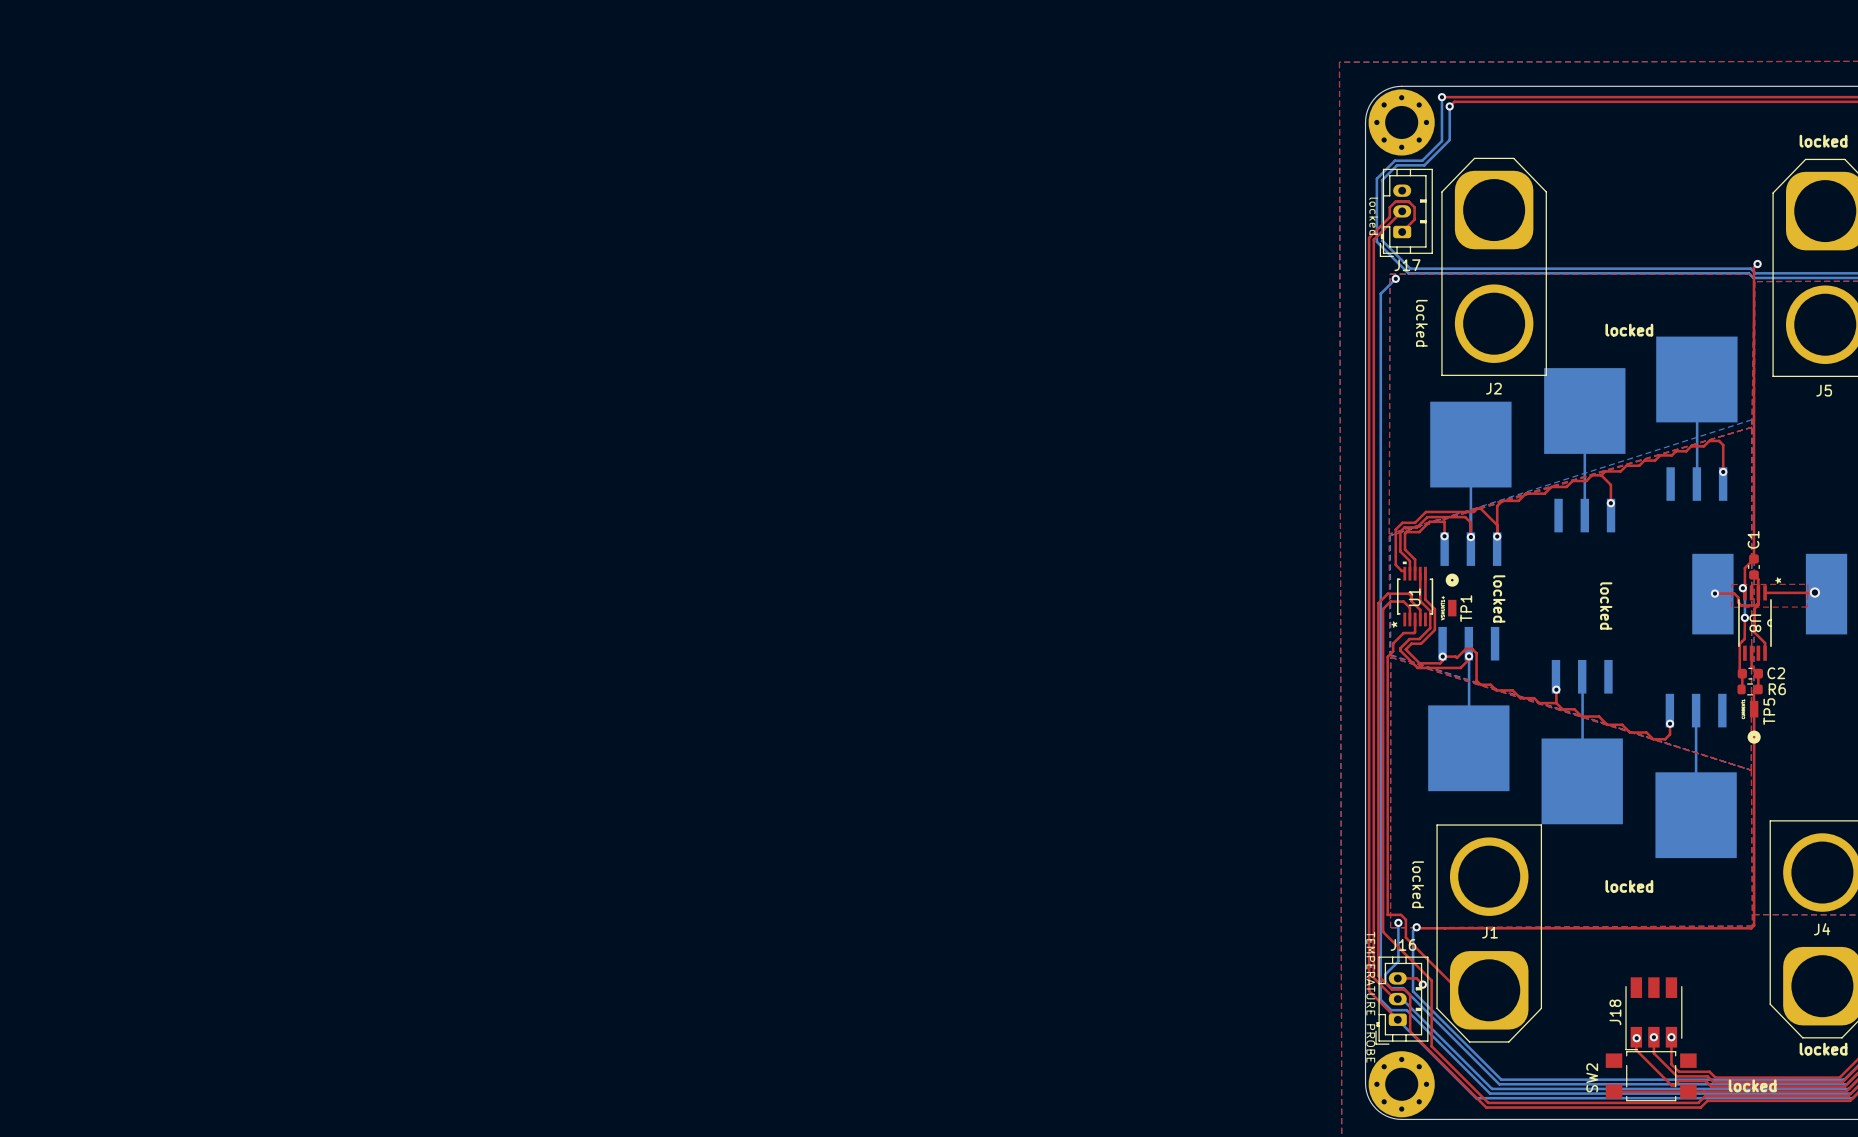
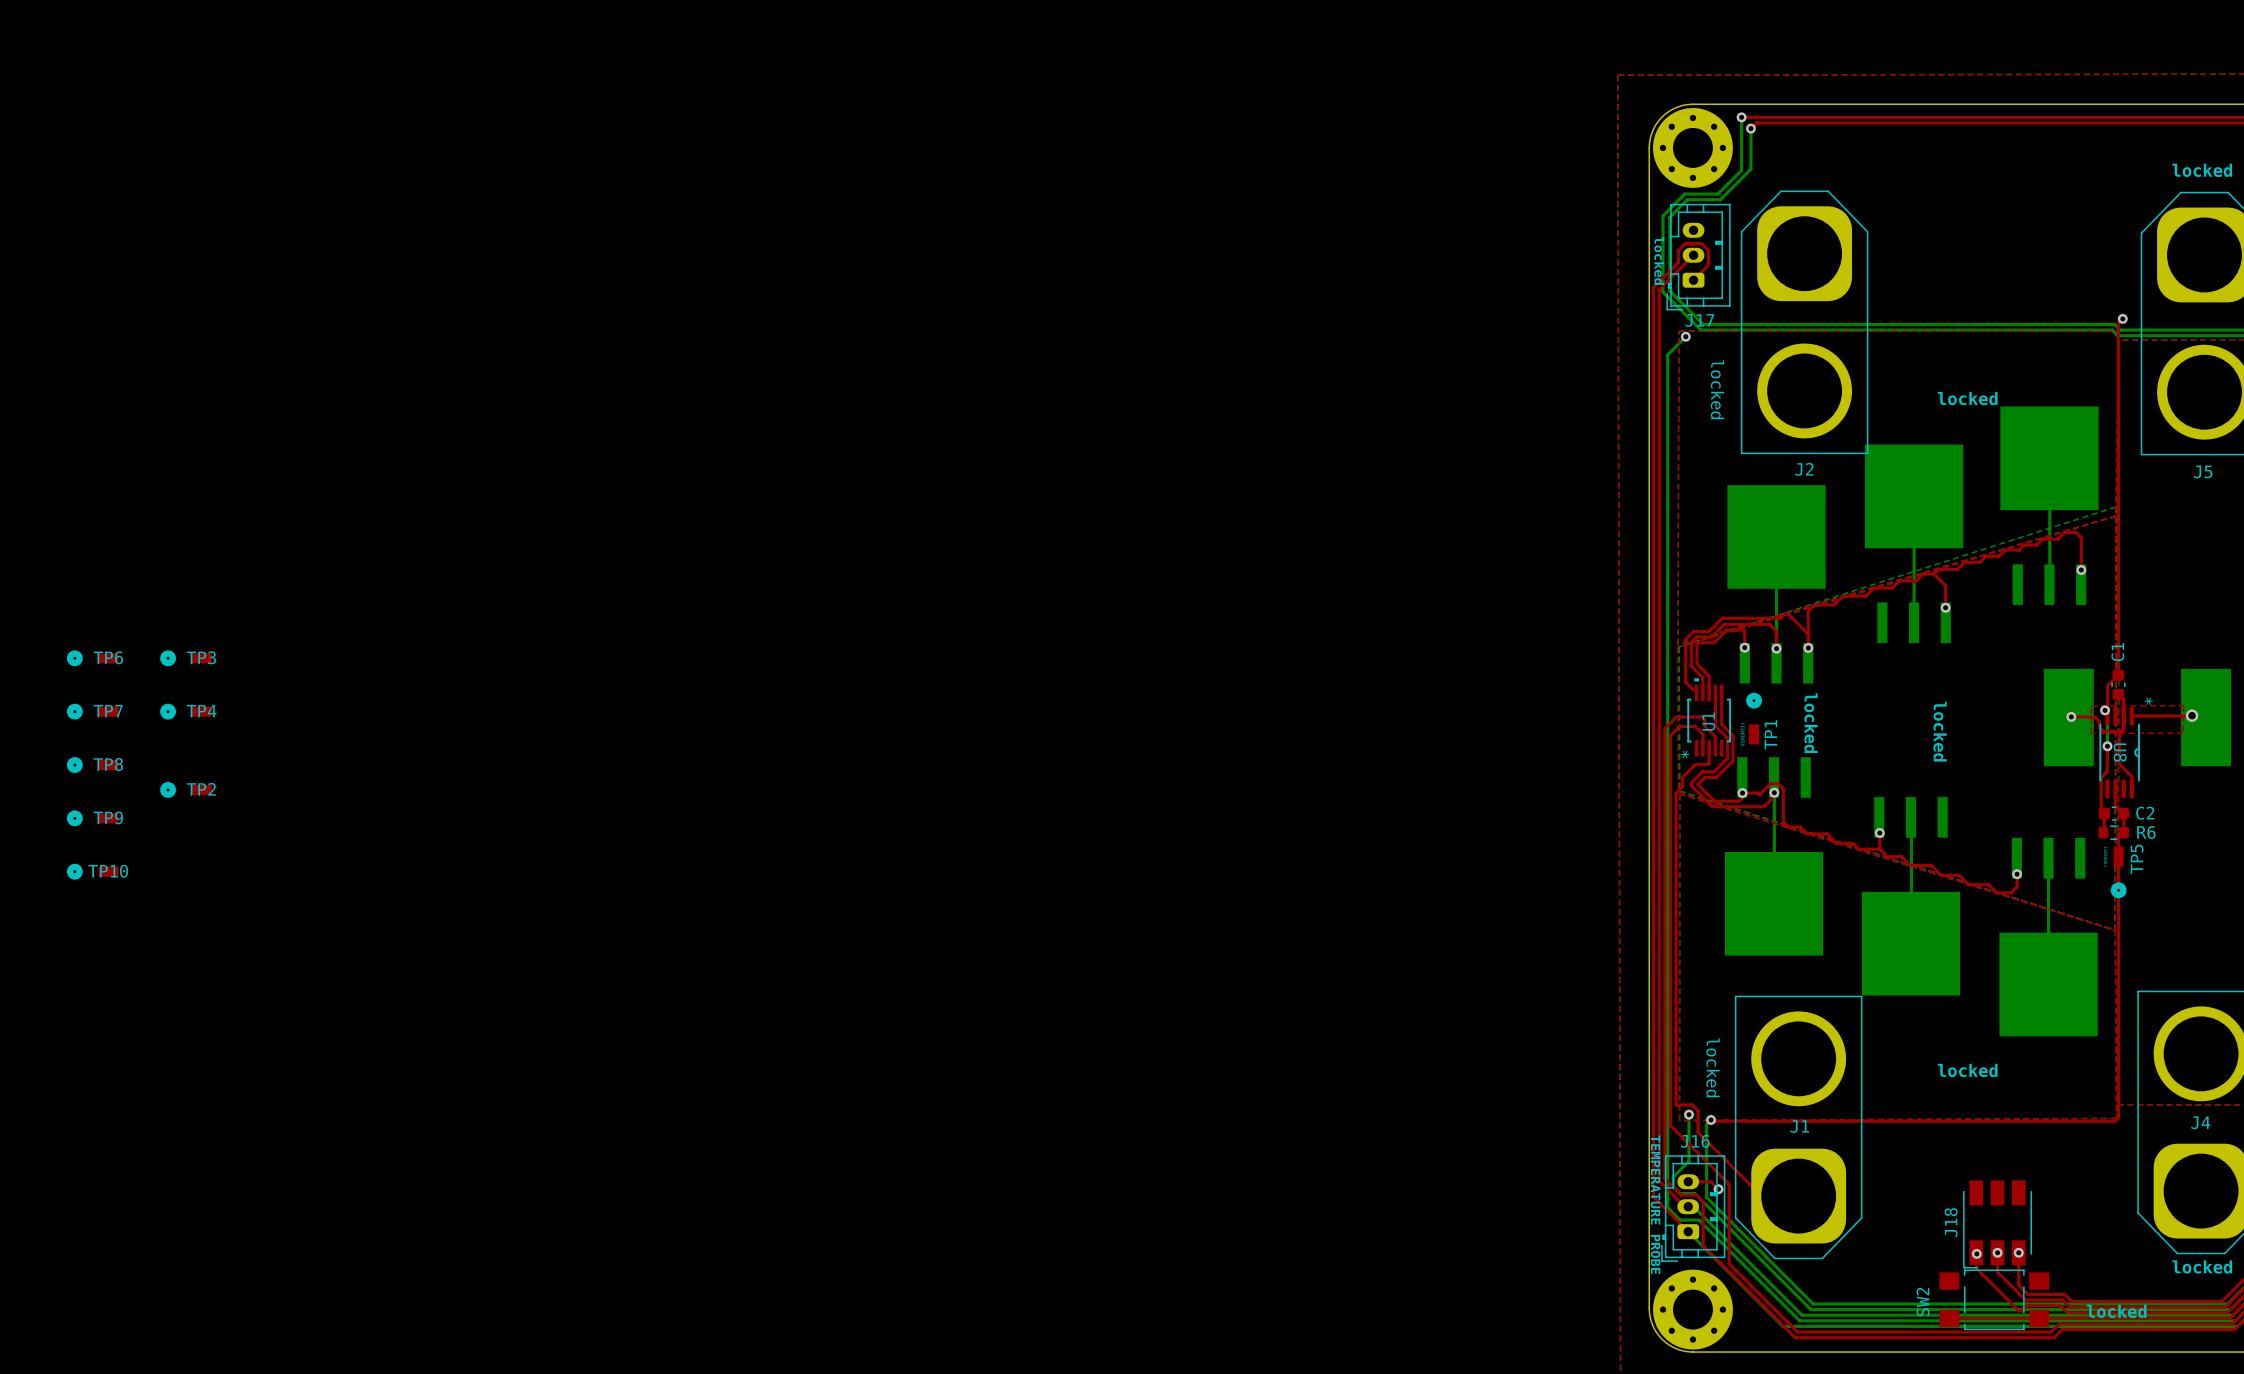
TP6: none -> (92, 658)
TP3: none -> (185, 658)
TP7: none -> (92, 711)
TP4: none -> (185, 711)
TP8: none -> (92, 765)
TP2: none -> (185, 789)
TP9: none -> (92, 818)
TP10: none -> (92, 871)

